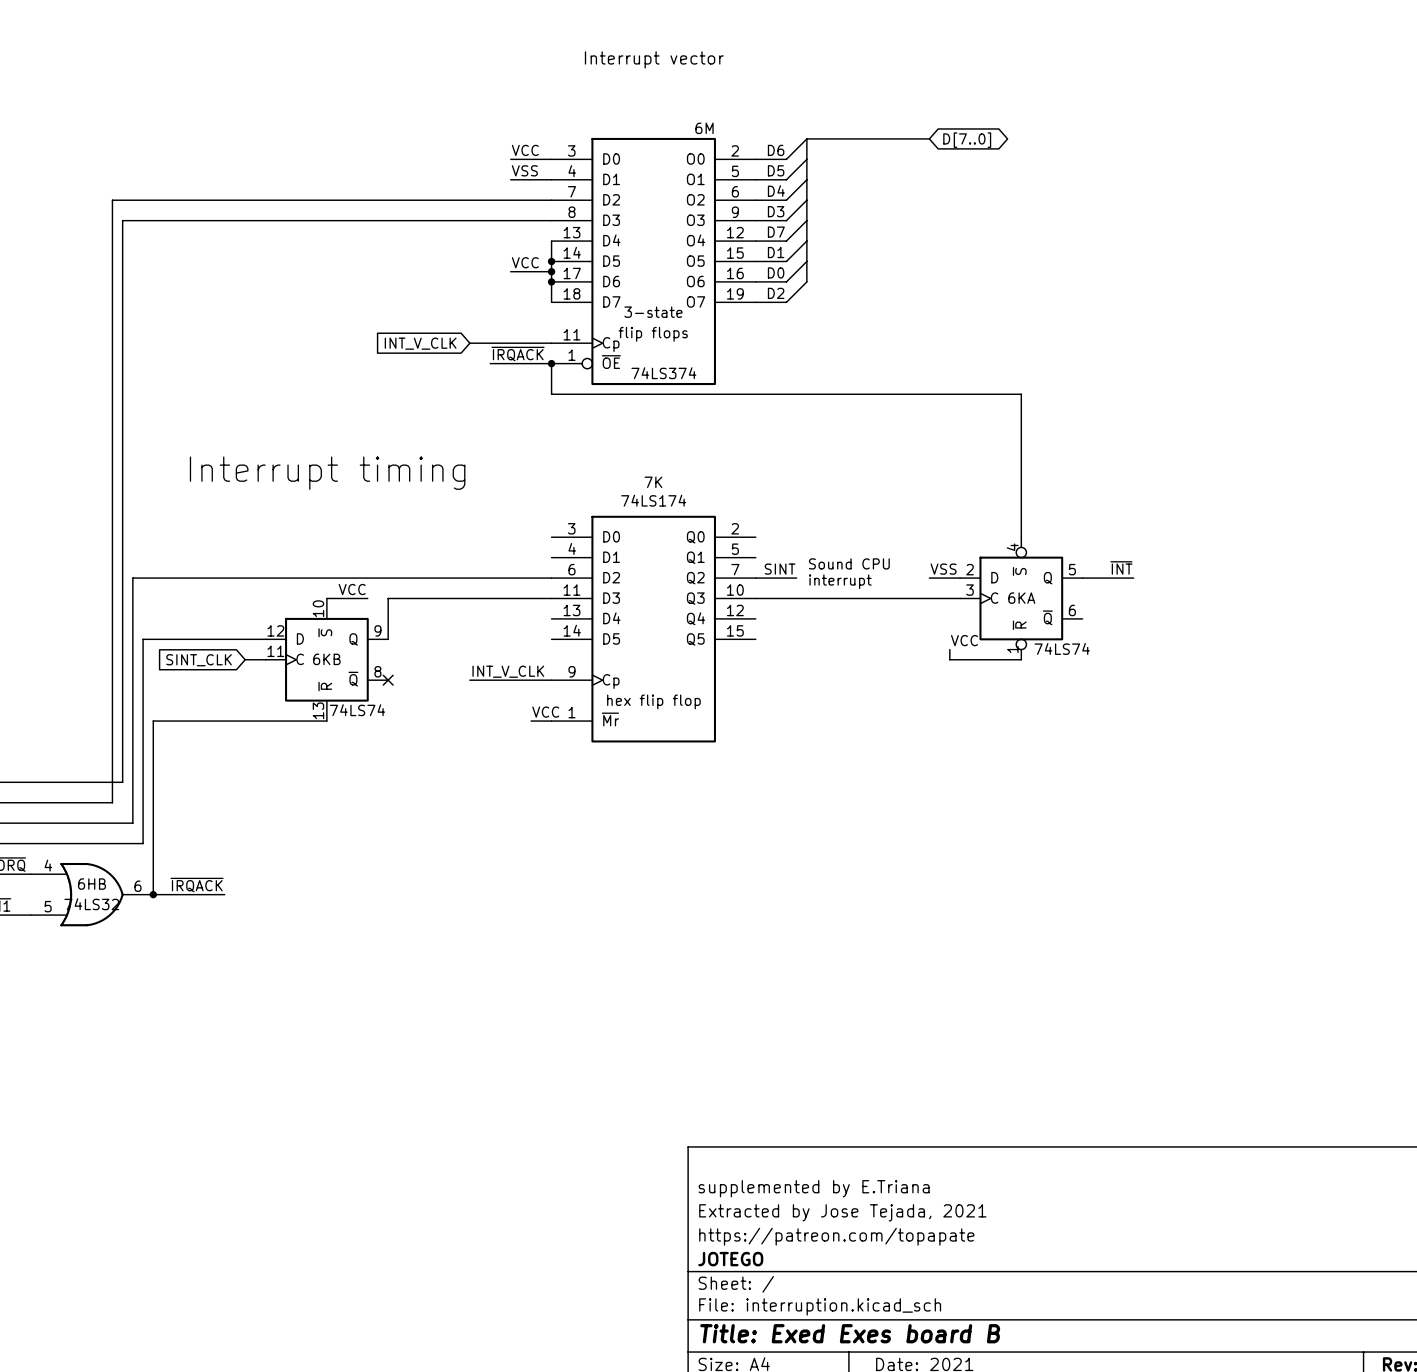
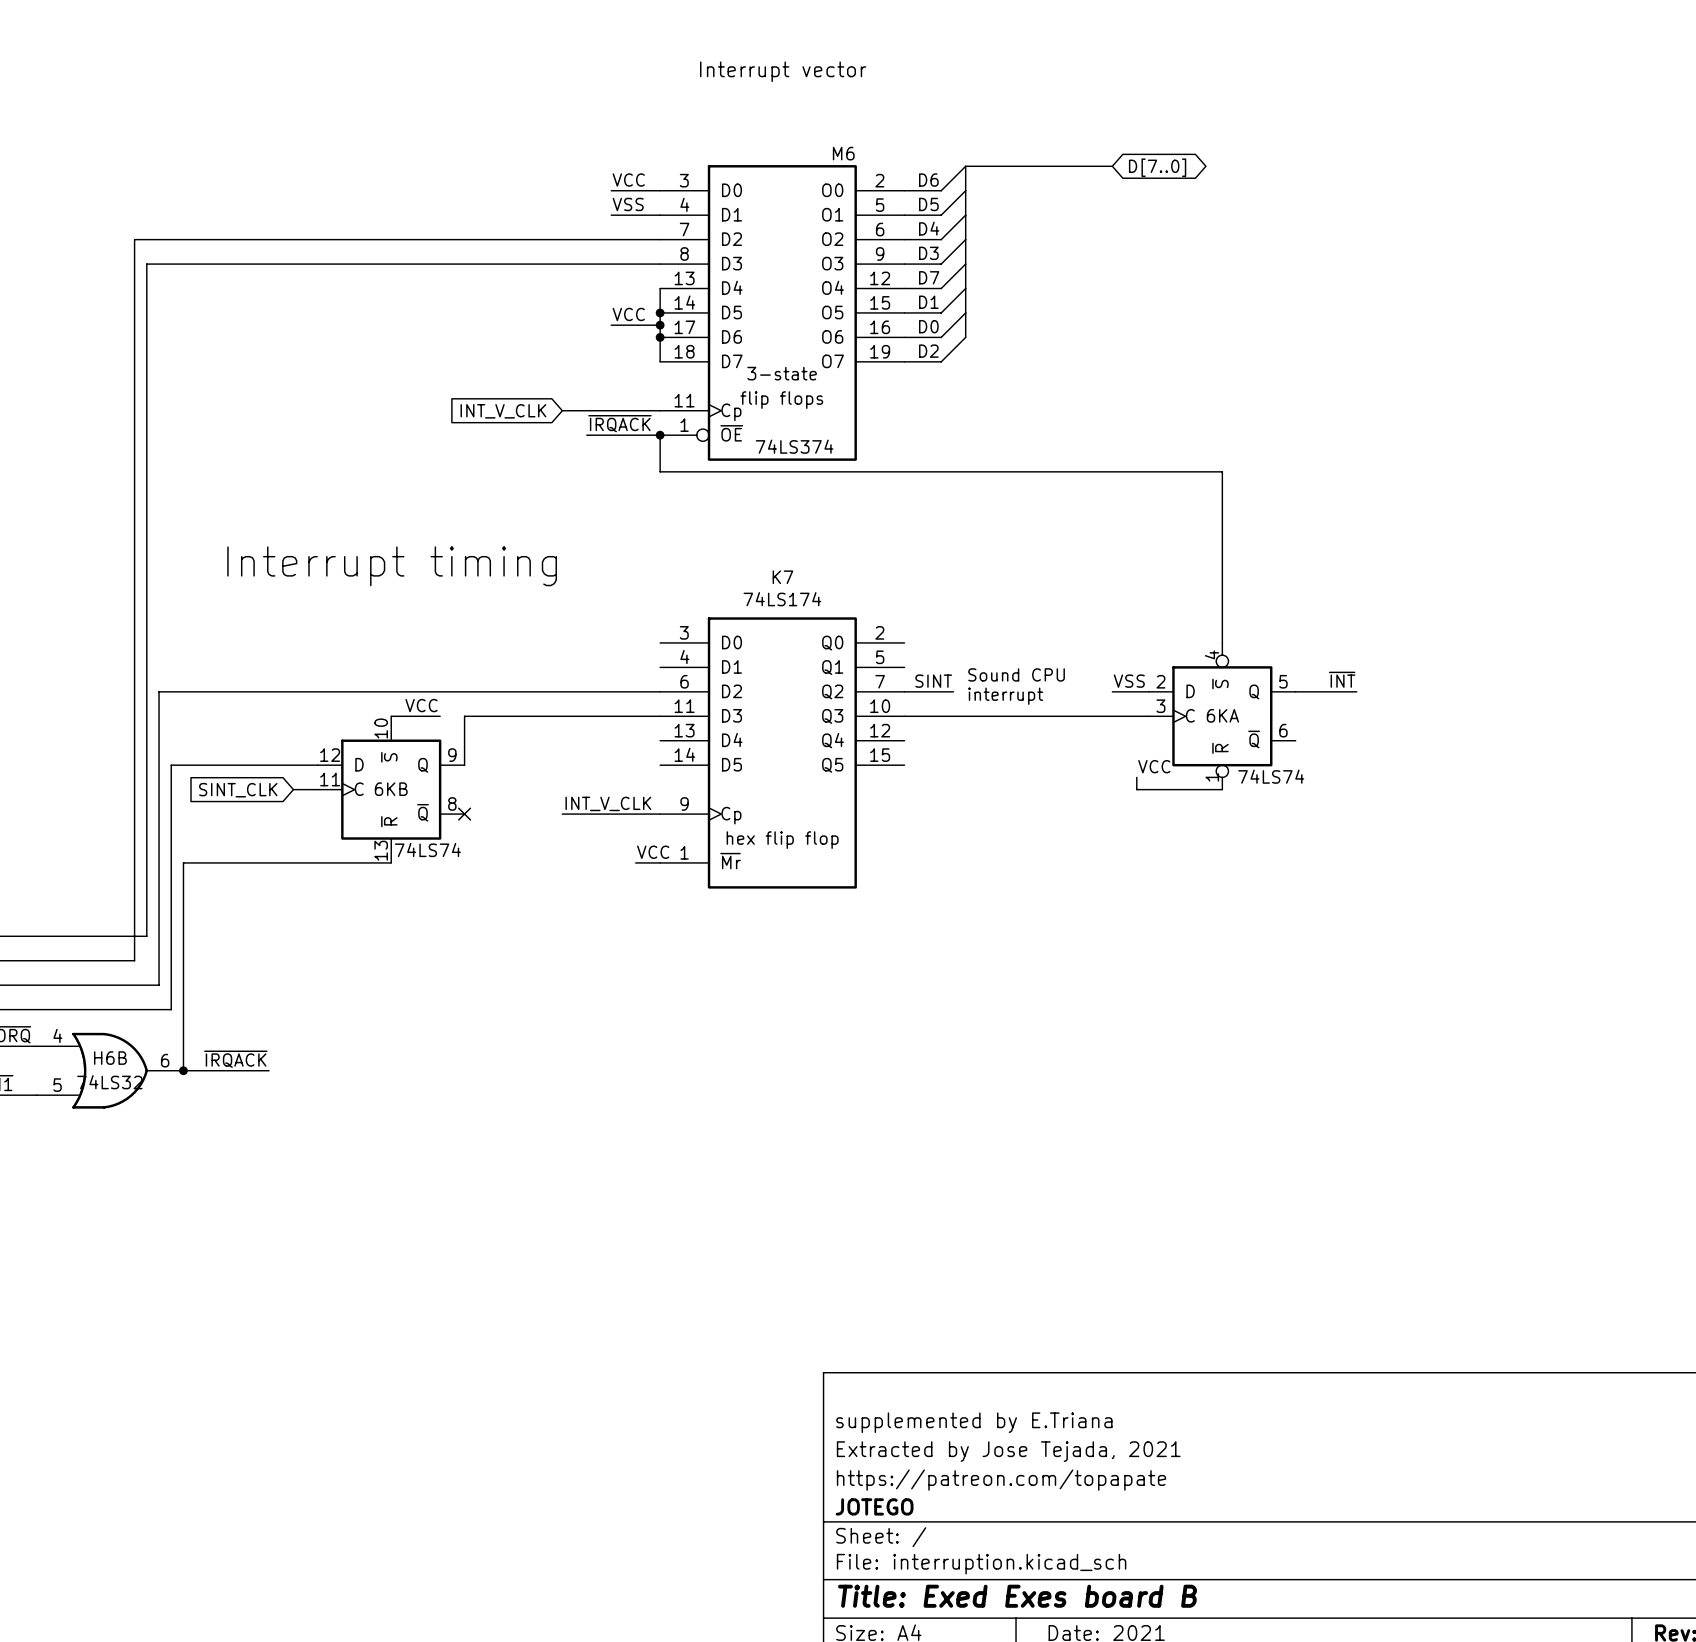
6M name: 6M (704, 128) -> M6 (843, 153)
7K name: 7K (653, 482) -> K7 (782, 577)
6HB name: 6HB (92, 884) -> H6B (110, 1058)

